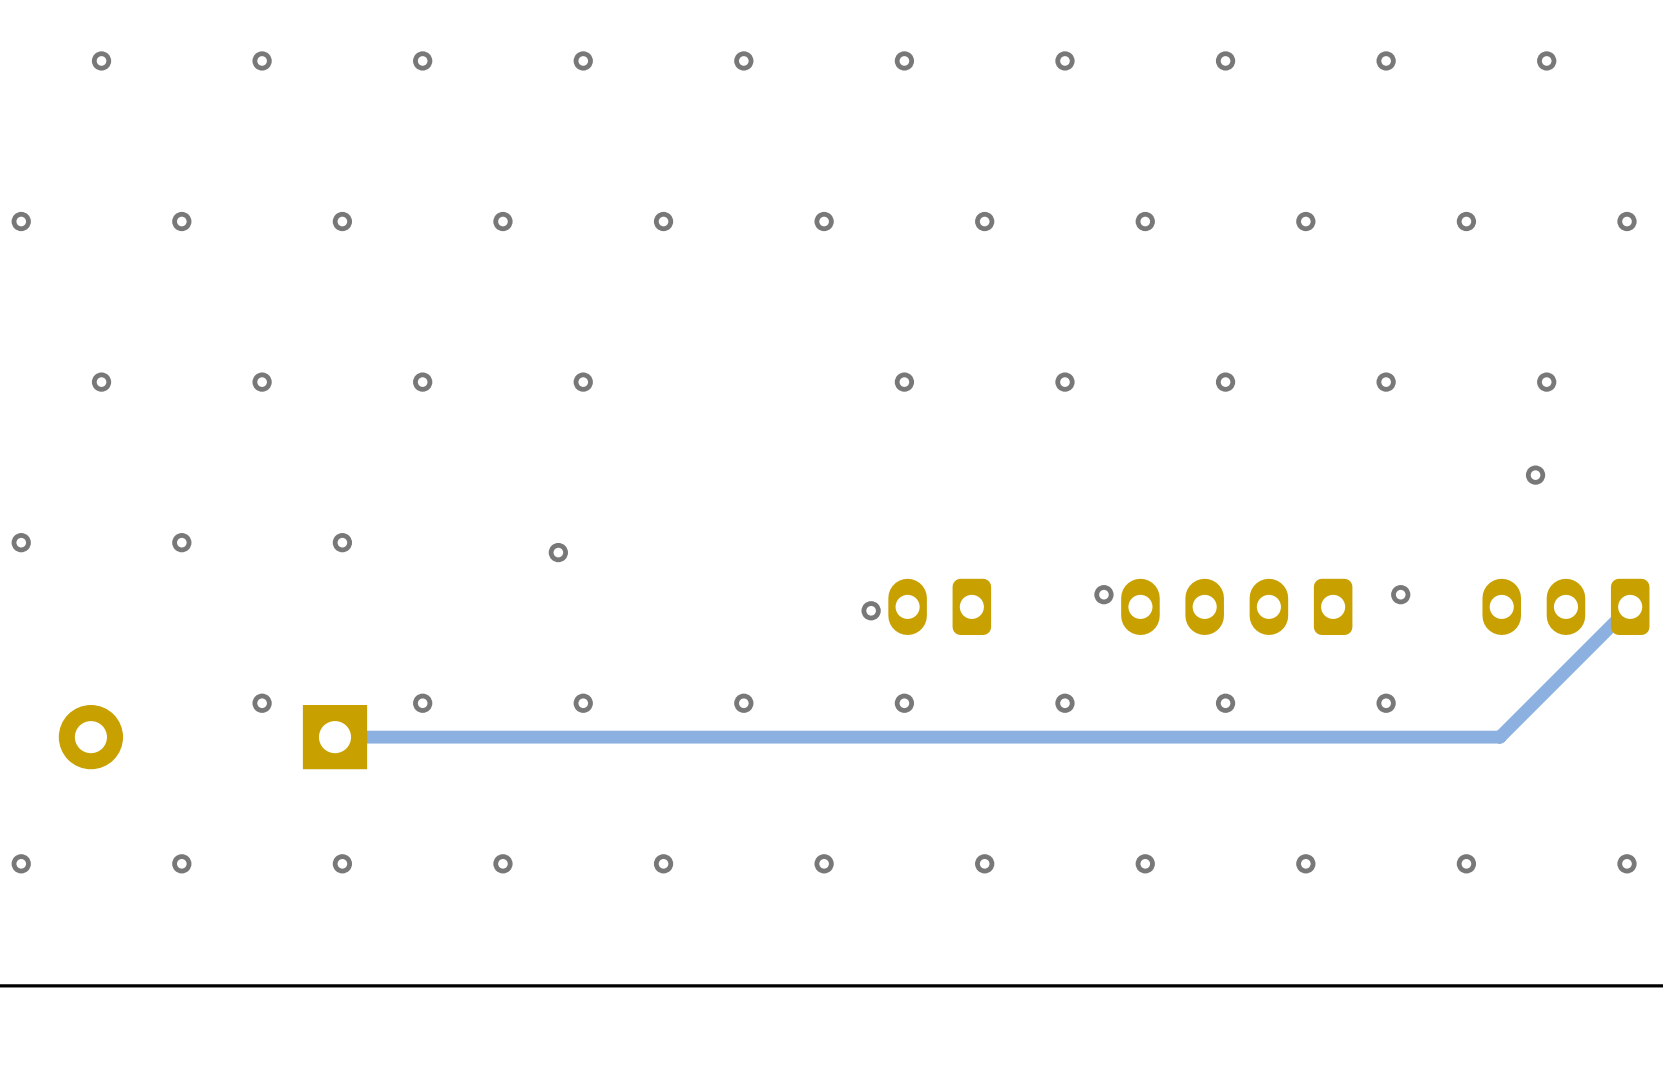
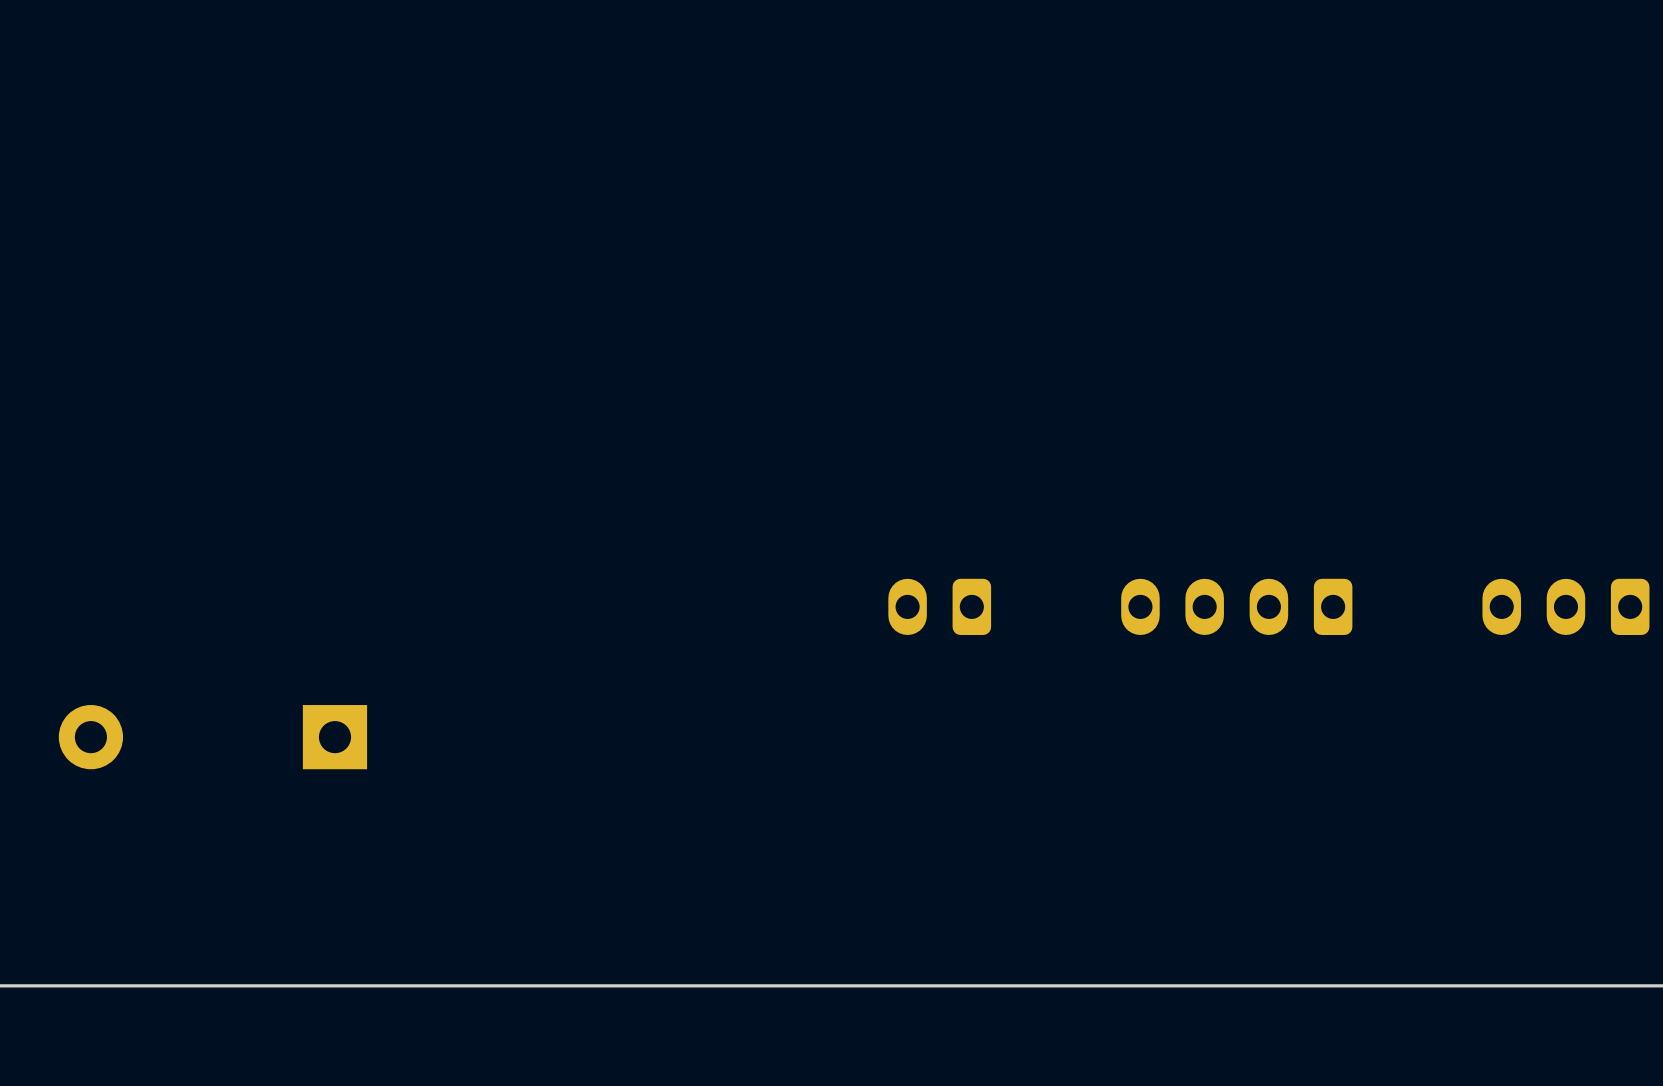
via: (101, 60) -> none
via: (262, 60) -> none
via: (422, 60) -> none
via: (583, 60) -> none
via: (743, 60) -> none
via: (904, 60) -> none
via: (1064, 60) -> none
via: (1225, 60) -> none
via: (1386, 60) -> none
via: (1546, 60) -> none
via: (21, 221) -> none
via: (181, 221) -> none
via: (342, 221) -> none
via: (502, 221) -> none
via: (663, 221) -> none
via: (824, 221) -> none
via: (984, 221) -> none
via: (1145, 221) -> none
via: (1305, 221) -> none
via: (1466, 221) -> none
via: (1626, 221) -> none
via: (101, 382) -> none
via: (262, 382) -> none
via: (422, 382) -> none
via: (583, 382) -> none
via: (904, 382) -> none
via: (1064, 382) -> none
via: (1225, 382) -> none
via: (1386, 382) -> none
via: (1546, 382) -> none
via: (1535, 475) -> none
via: (21, 542) -> none
via: (181, 542) -> none
via: (342, 542) -> none
via: (558, 552) -> none
via: (1103, 594) -> none
via: (1400, 594) -> none
track: (1630, 606) (1499, 737) (334, 737) -> none
via: (871, 610) -> none
via: (262, 703) -> none
via: (422, 703) -> none
via: (583, 703) -> none
via: (743, 703) -> none
via: (904, 703) -> none
via: (1064, 703) -> none
via: (1225, 703) -> none
via: (1386, 703) -> none
via: (21, 863) -> none
via: (181, 863) -> none
via: (342, 863) -> none
via: (502, 863) -> none
via: (663, 863) -> none
via: (824, 863) -> none
via: (984, 863) -> none
via: (1145, 863) -> none
via: (1305, 863) -> none
via: (1466, 863) -> none
via: (1626, 863) -> none

